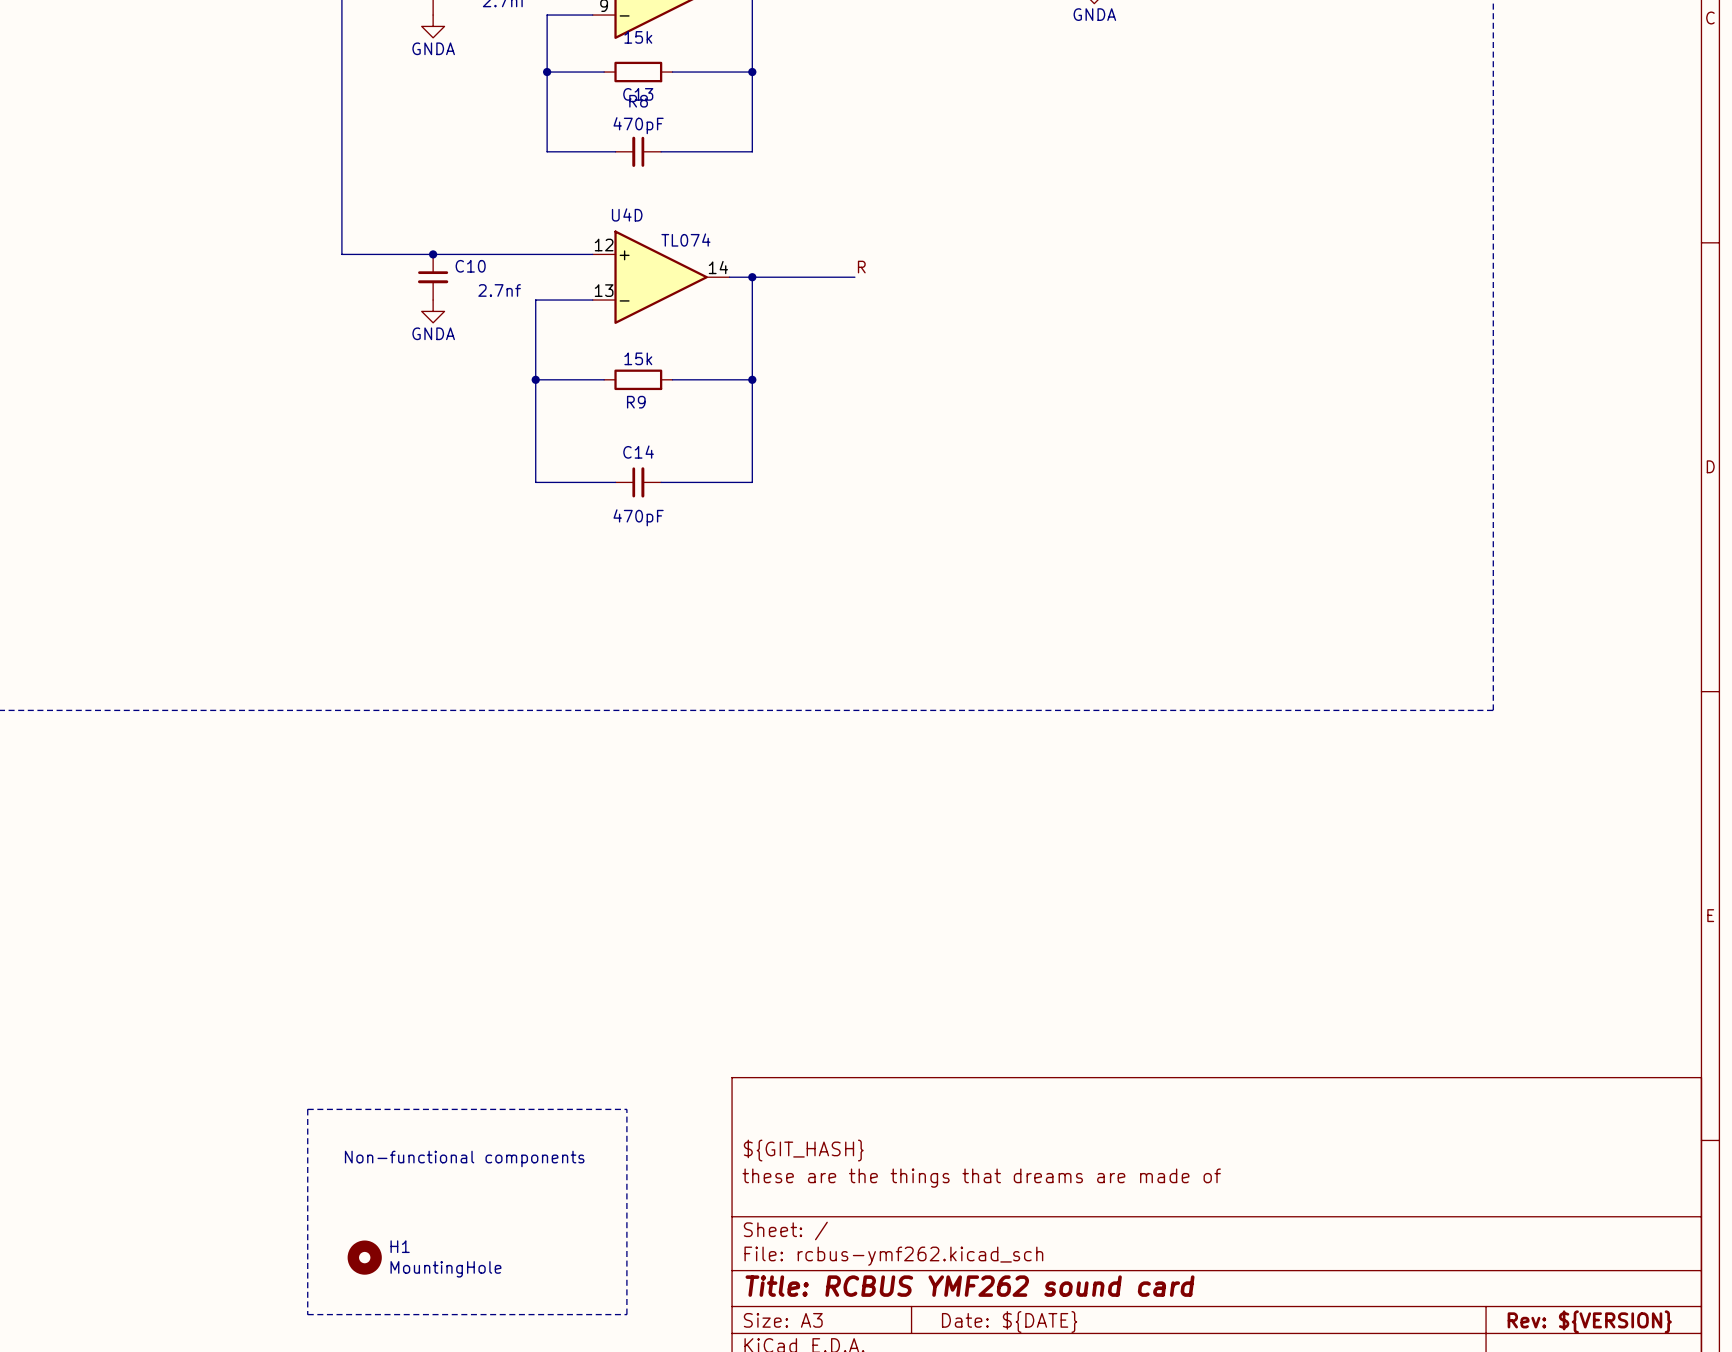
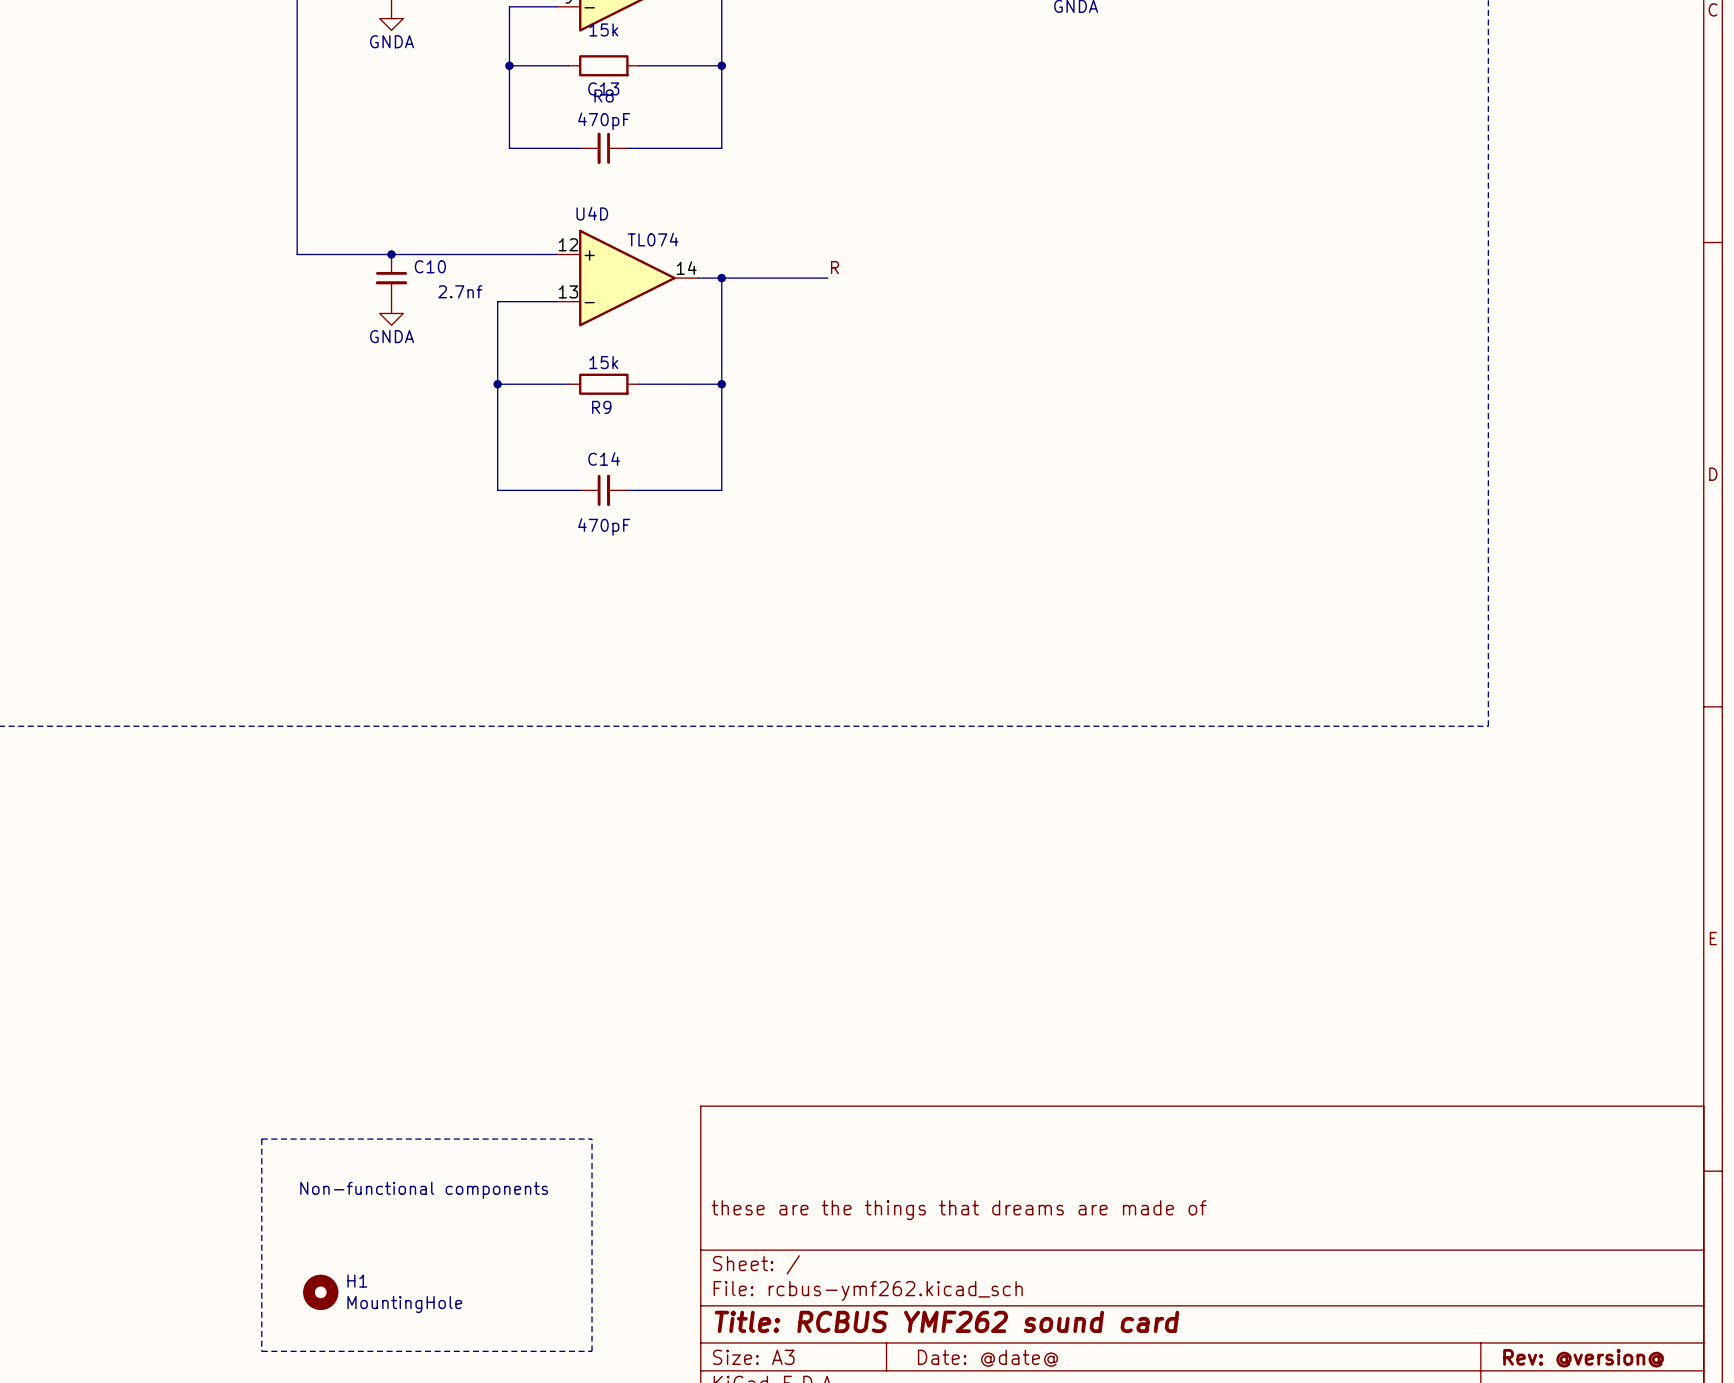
title block: ${GIT_HASH} (803, 1150) -> none
title block: Date: ${DATE} (1009, 1321) -> Date: @date@ (987, 1358)
title block: Rev: ${VERSION} (1589, 1321) -> Rev: @version@ (1583, 1358)

